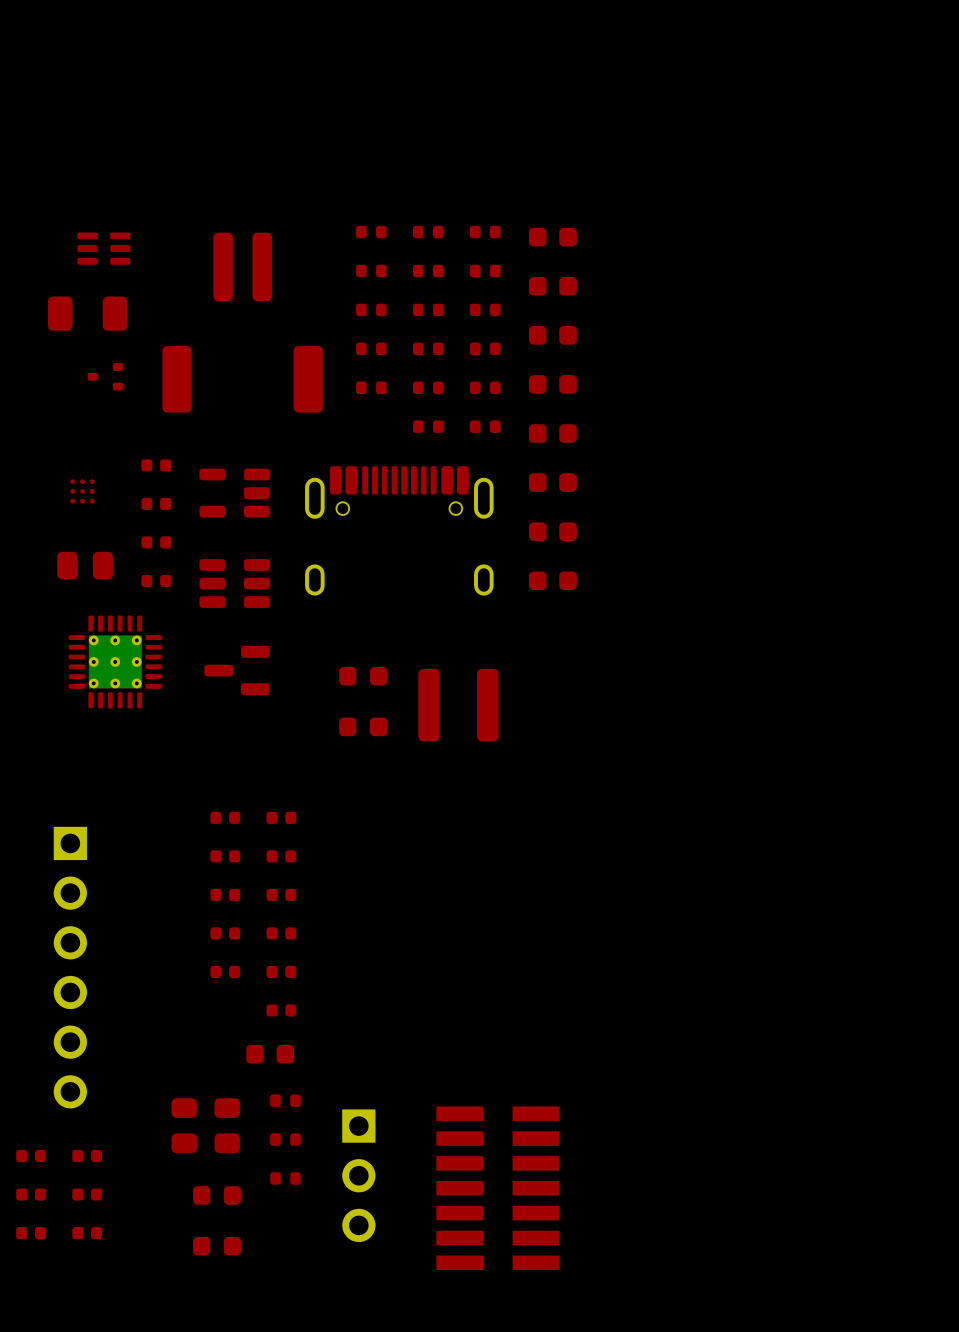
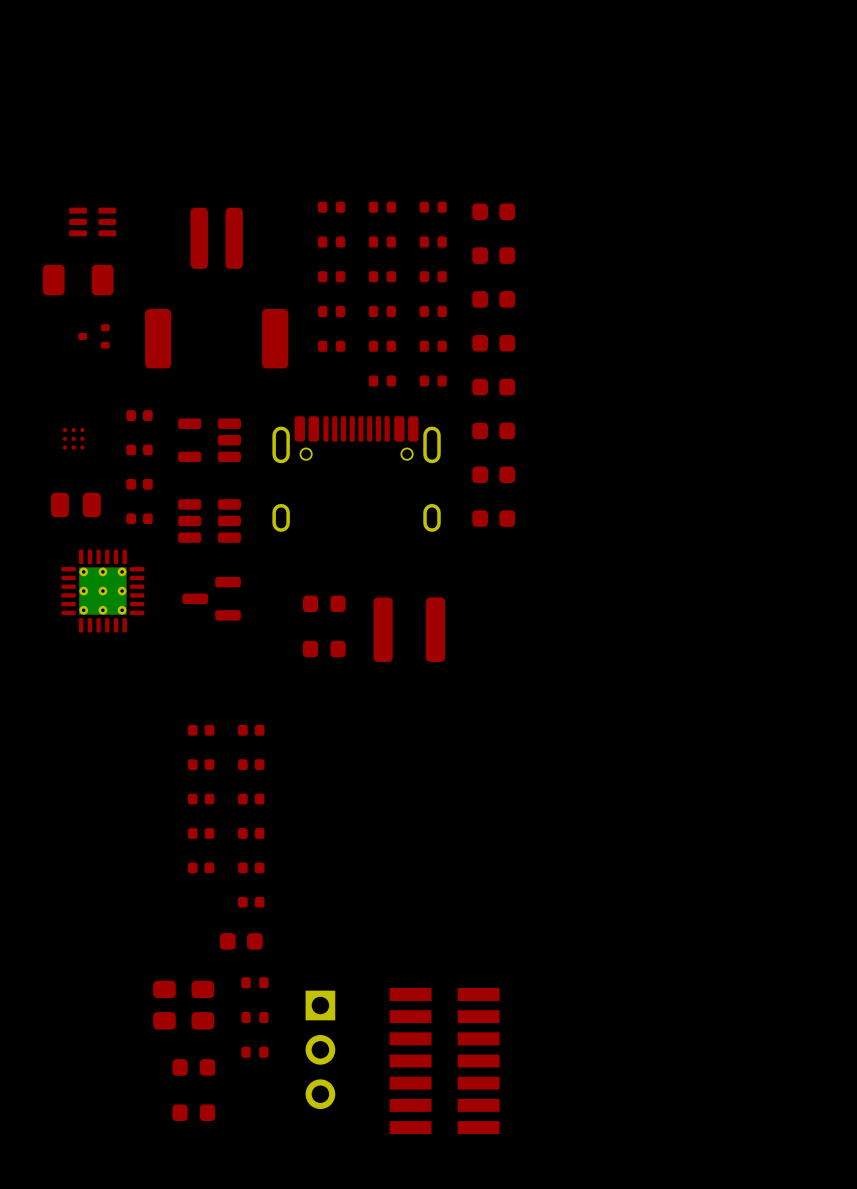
part: (70, 967) -> none
part: (31, 1155) -> none
part: (87, 1155) -> none
part: (31, 1194) -> none
part: (87, 1194) -> none
part: (31, 1233) -> none
part: (87, 1233) -> none

